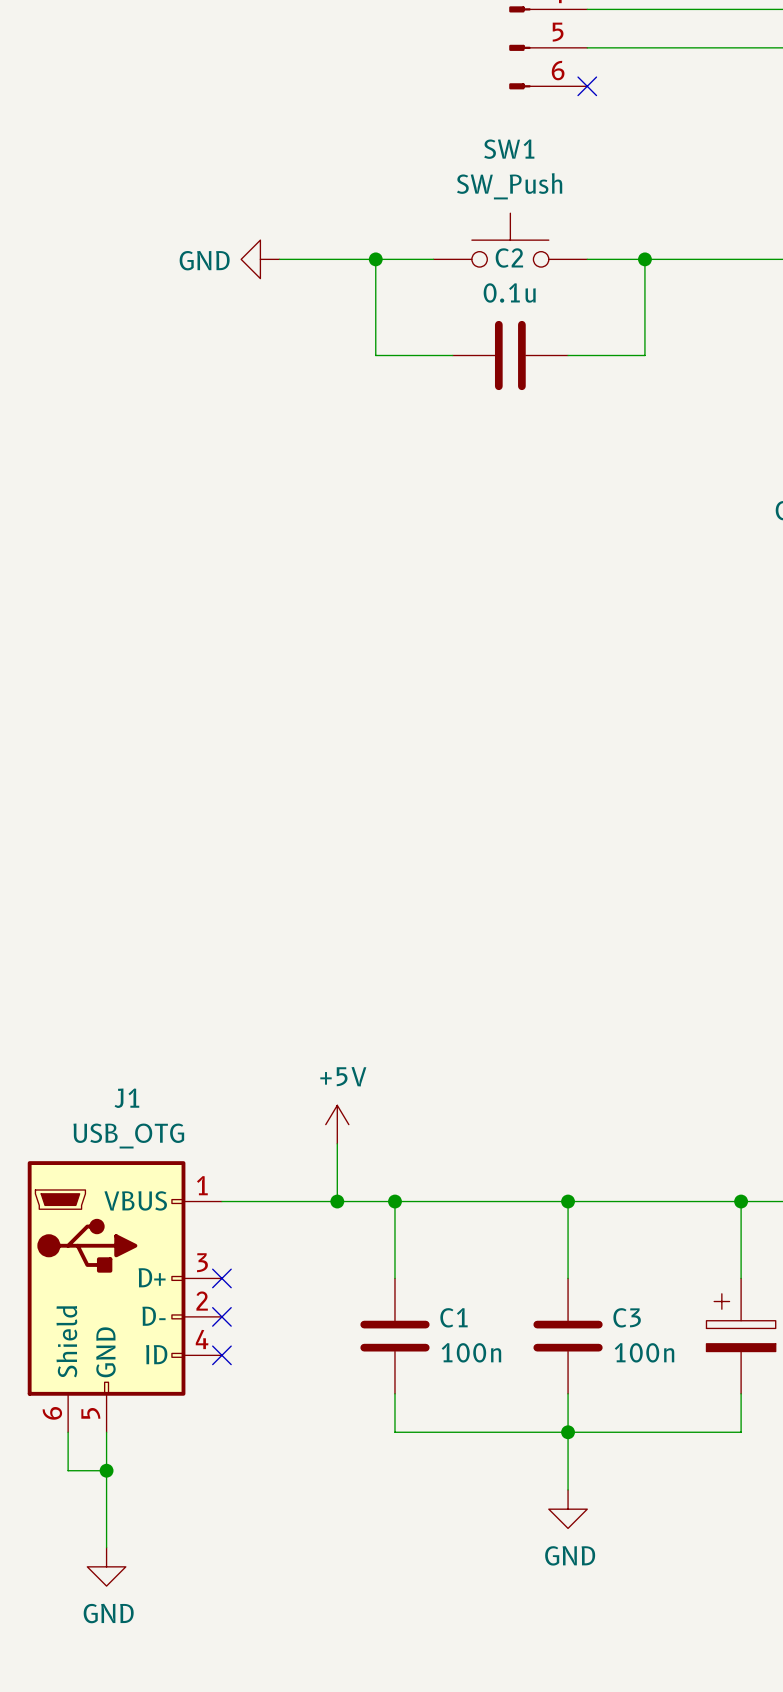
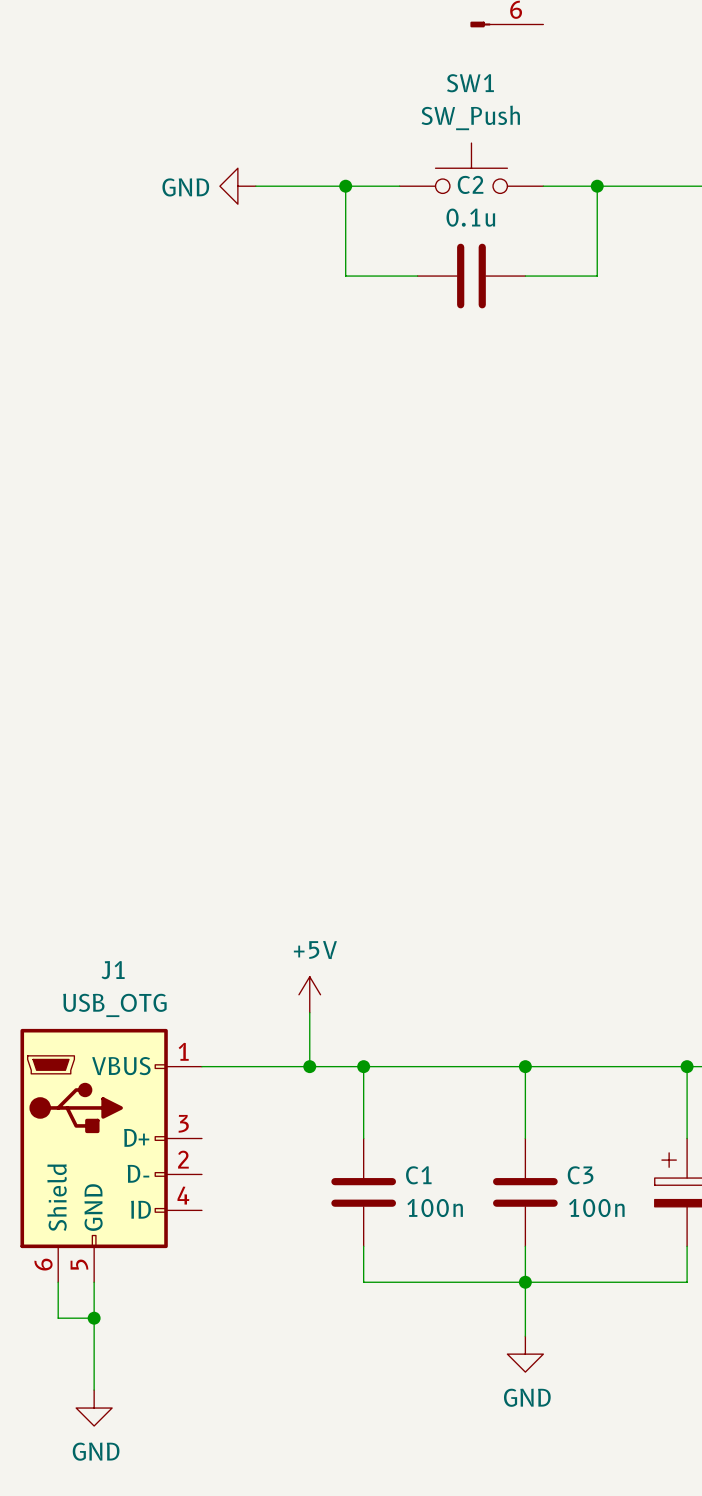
no-connect mark: (587, 86) -> none
no-connect mark: (221, 1278) -> none
no-connect mark: (221, 1316) -> none
no-connect mark: (221, 1355) -> none

